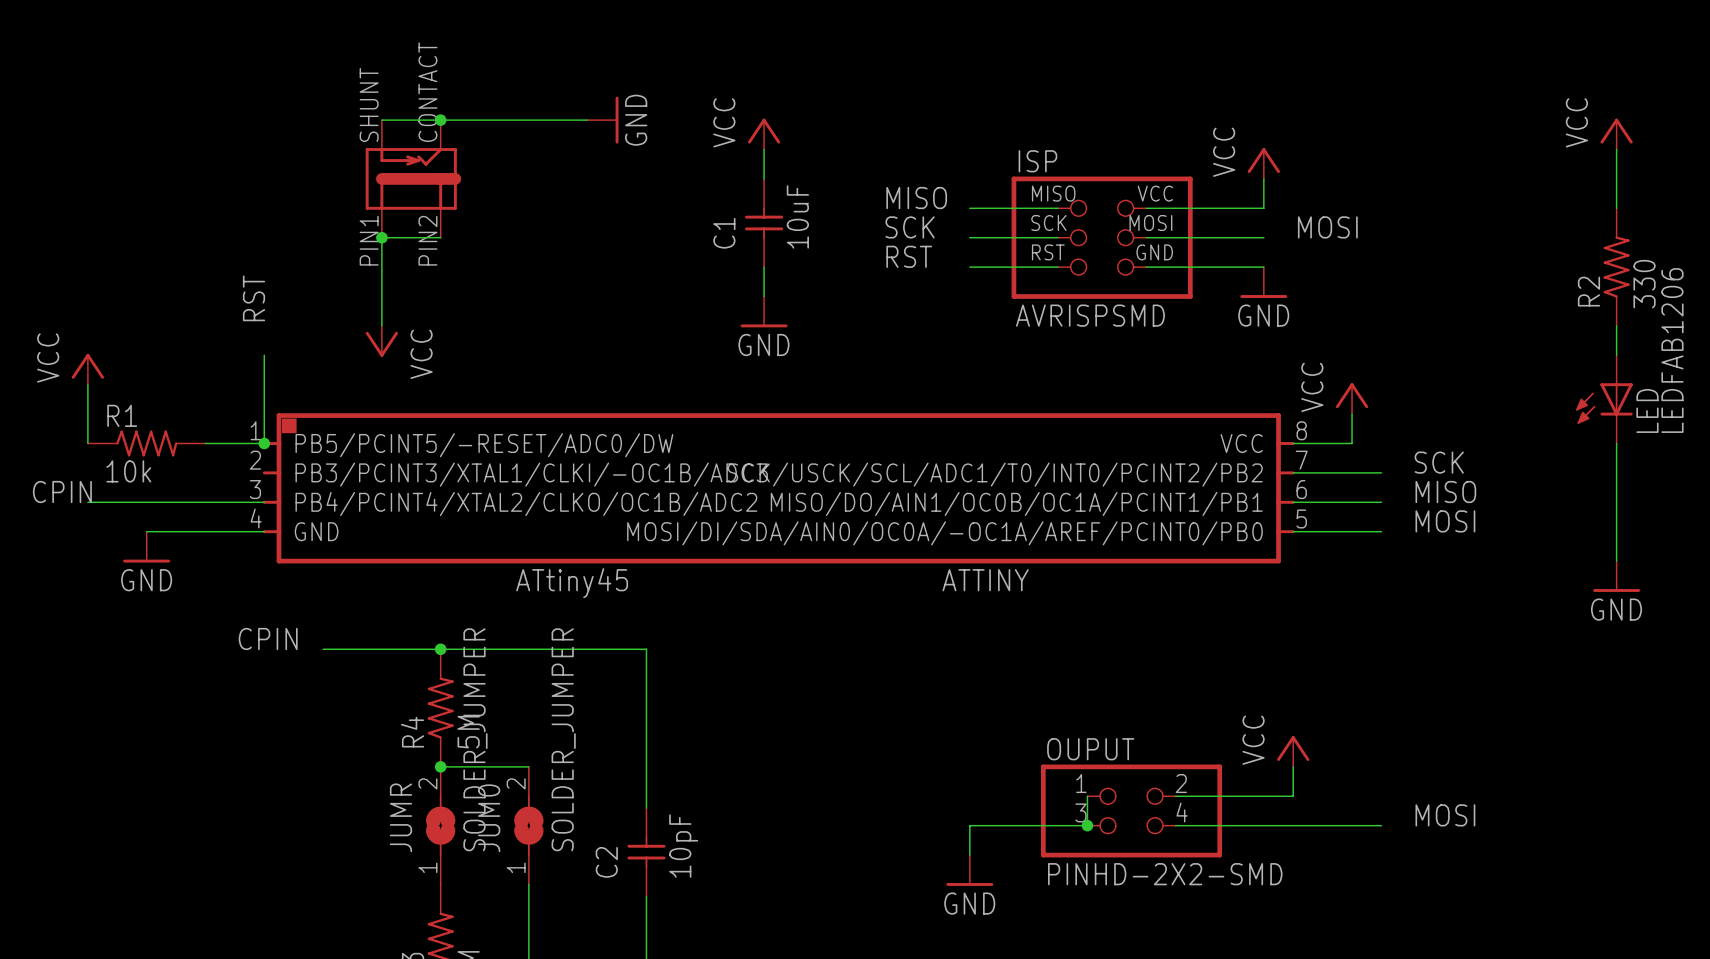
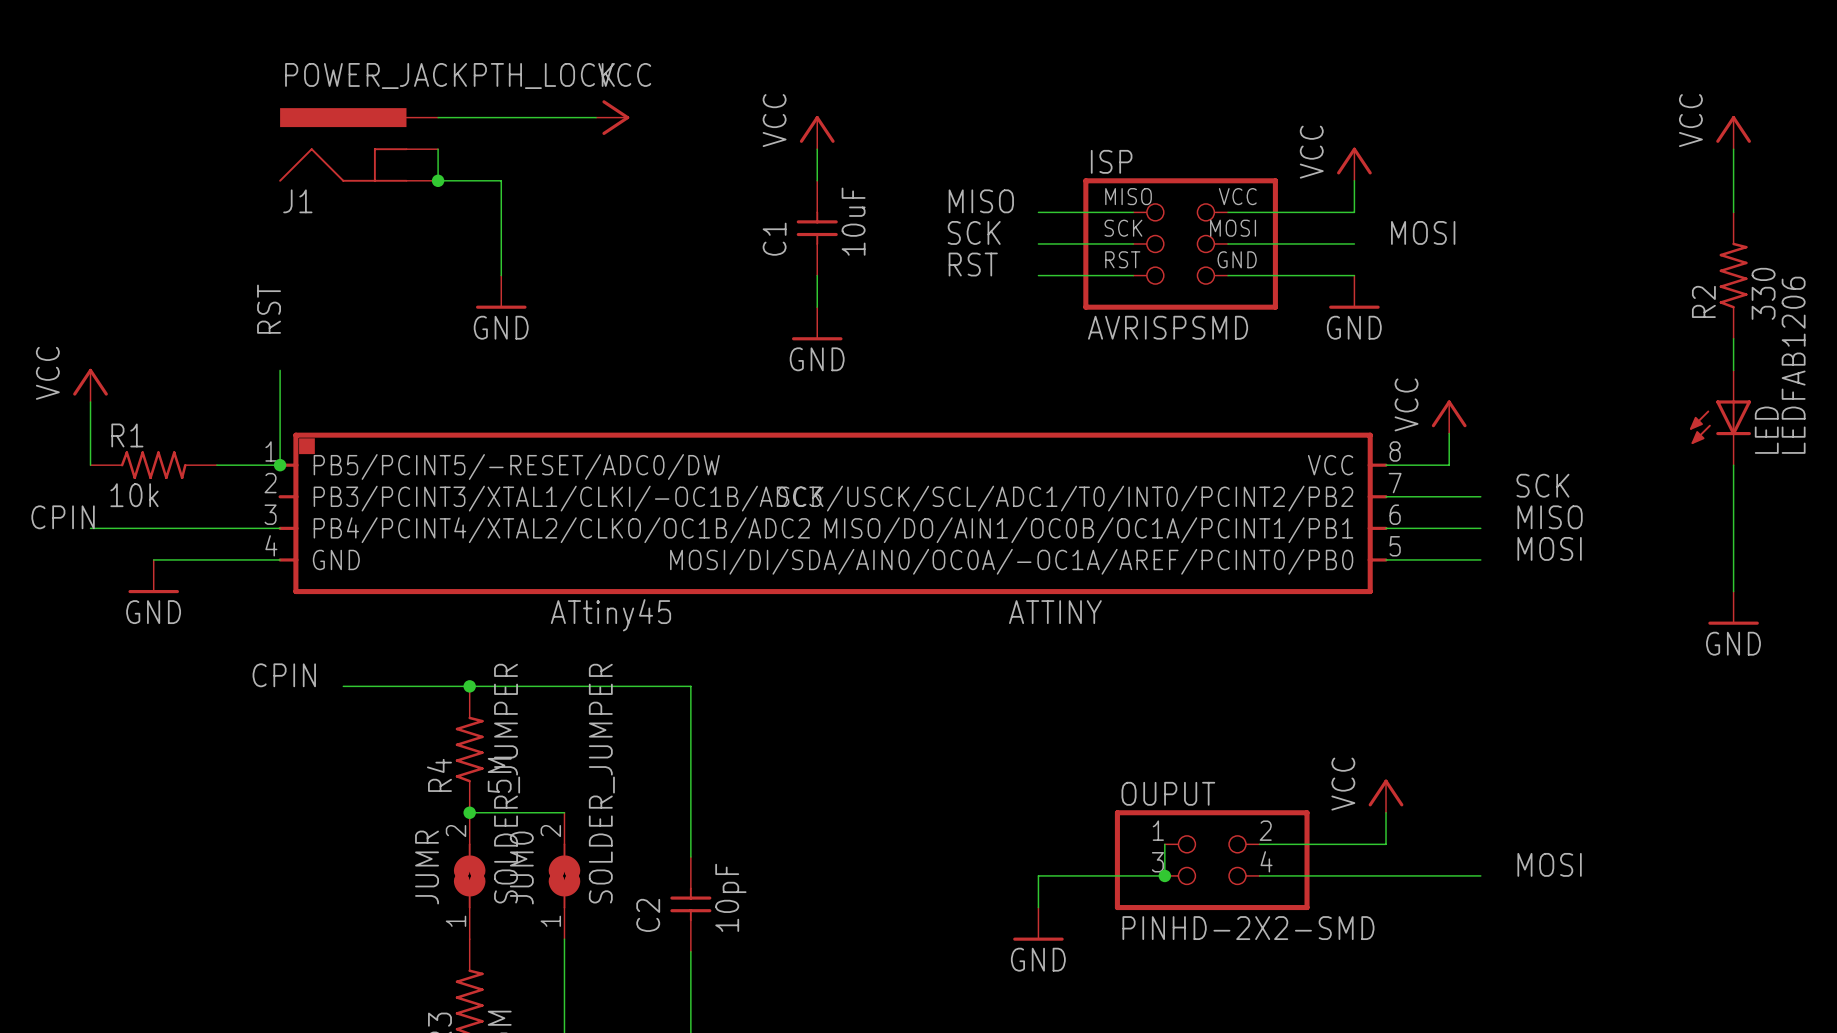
junction: (440, 120) -> none
power symbol: none -> VCC (612, 117)
power symbol position: GND (603, 120) -> GND (501, 292)
power symbol rotation: 0° (617, 120) -> 90° clockwise (501, 307)
J1: none -> POWER_JACKPTH_LOCK (358, 144)
wire: none -> (438, 149) (438, 180) (501, 180) (501, 275)
junction: none -> (438, 180)
part: (413, 178) -> none
junction: (381, 237) -> none
wire: (440, 237) (381, 237) (381, 325) -> none
power symbol: VCC (381, 341) -> none

